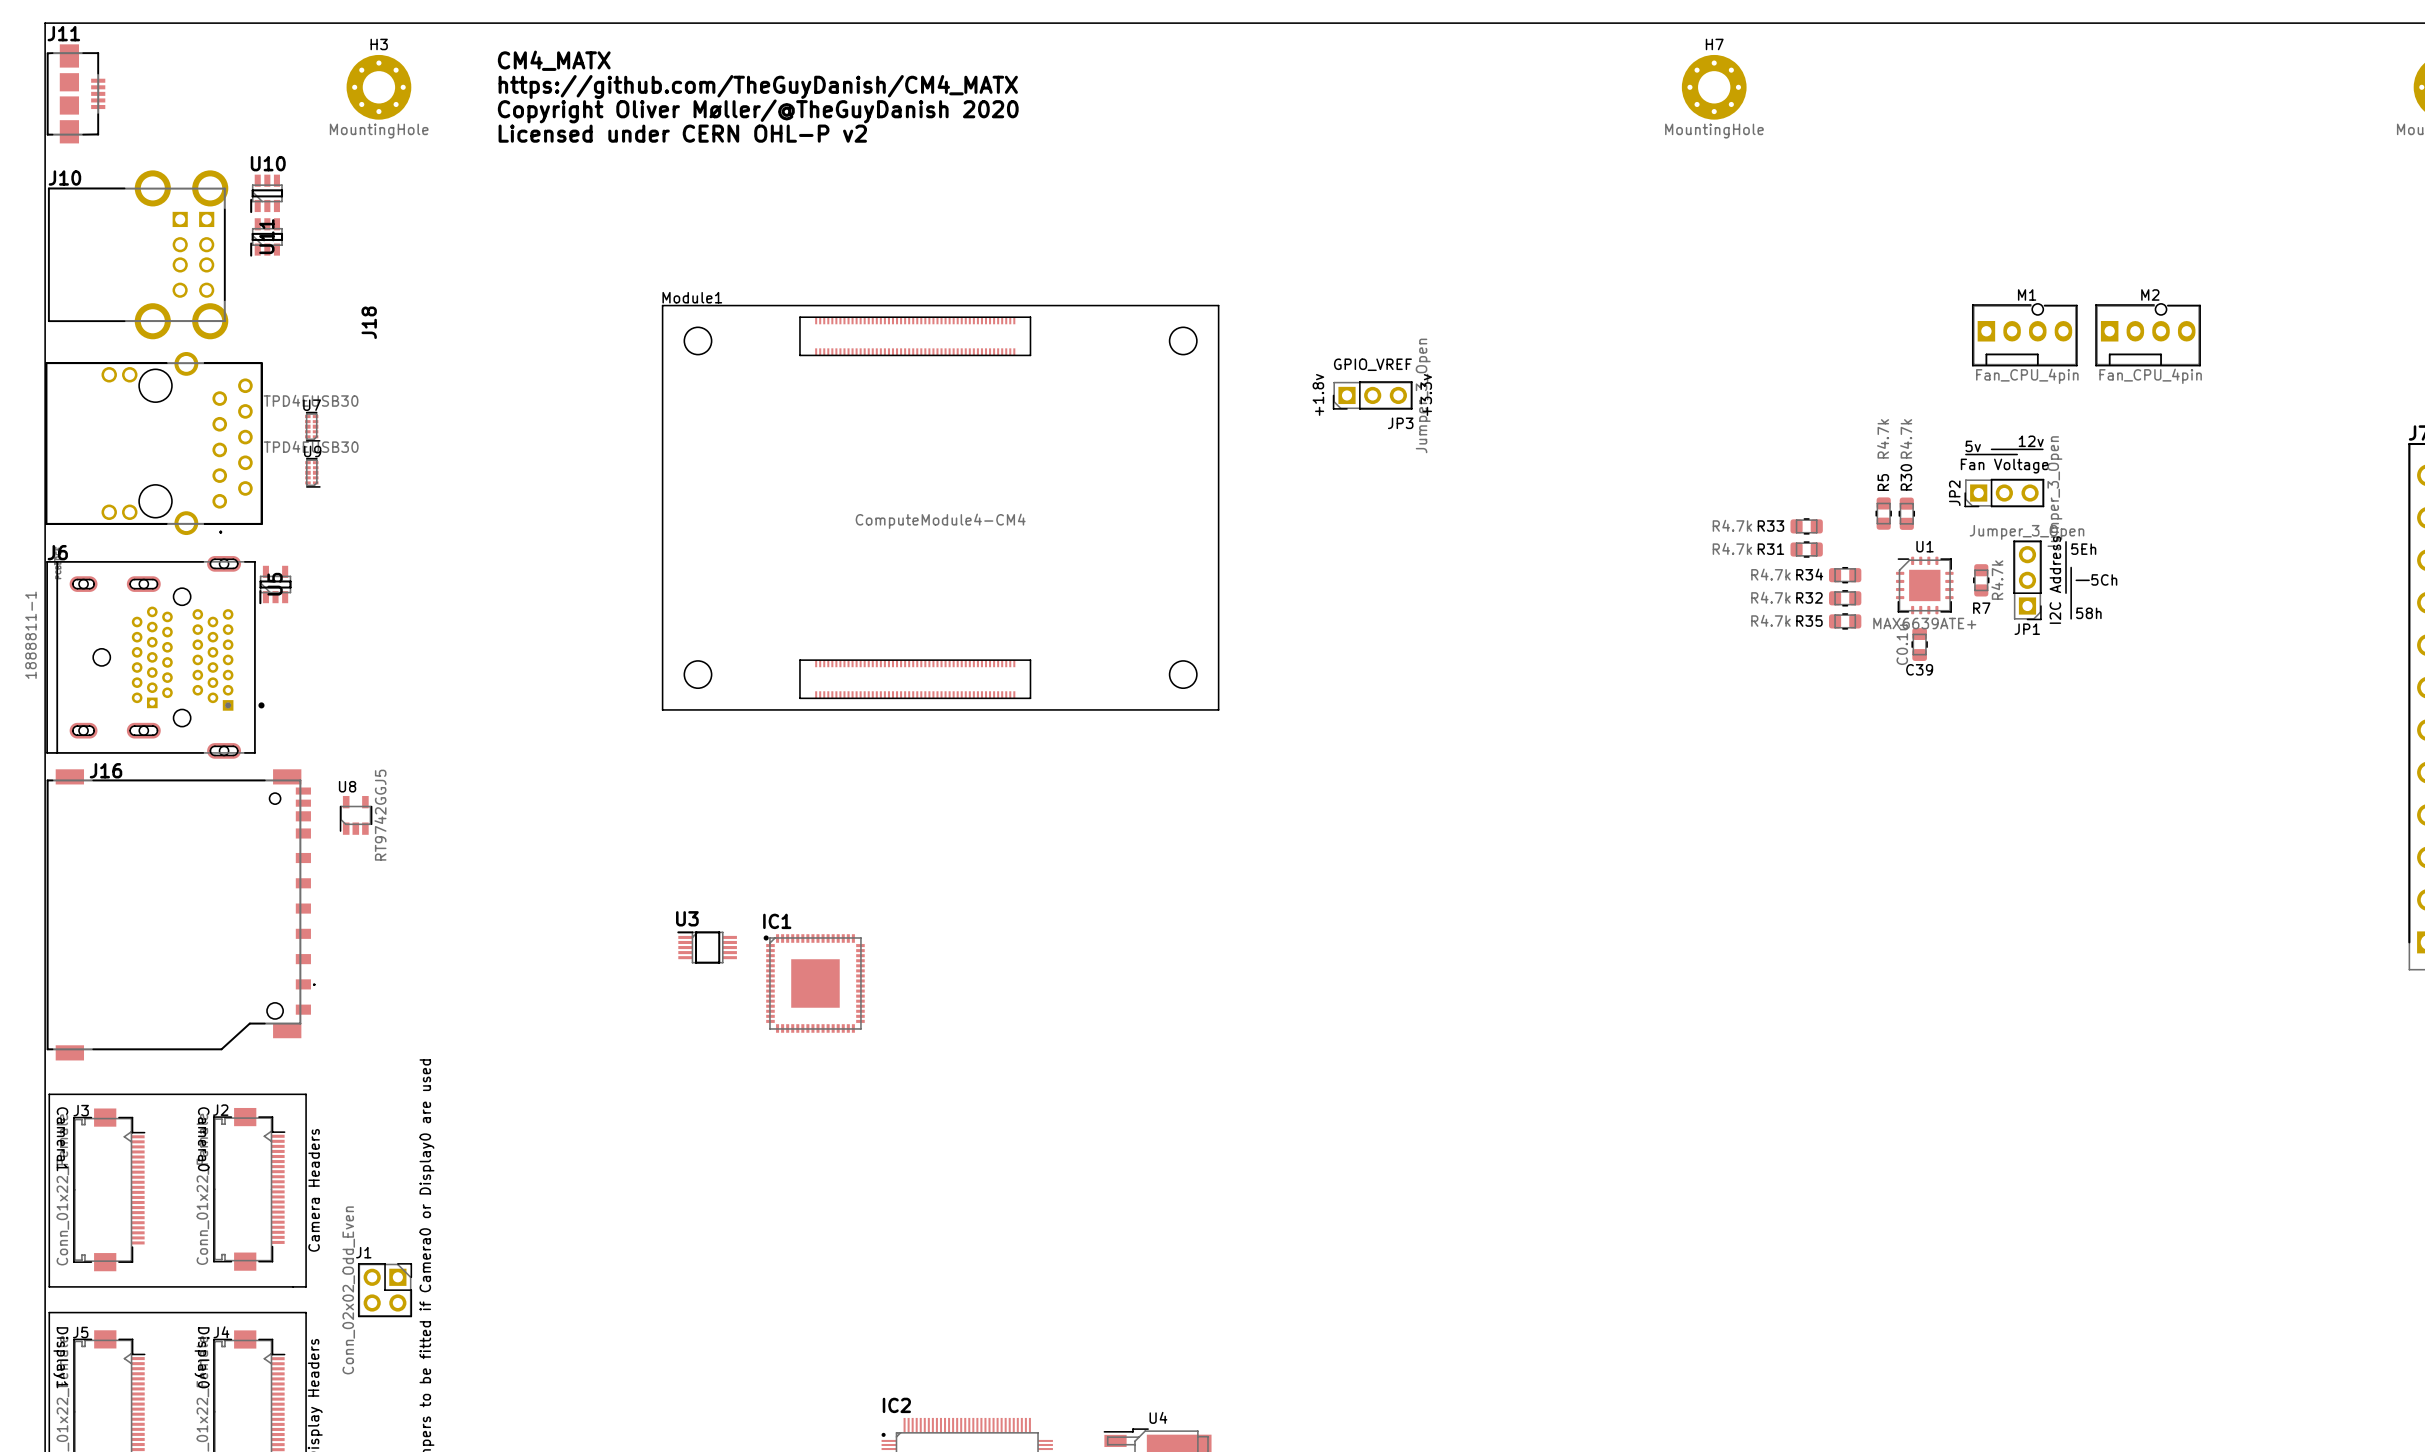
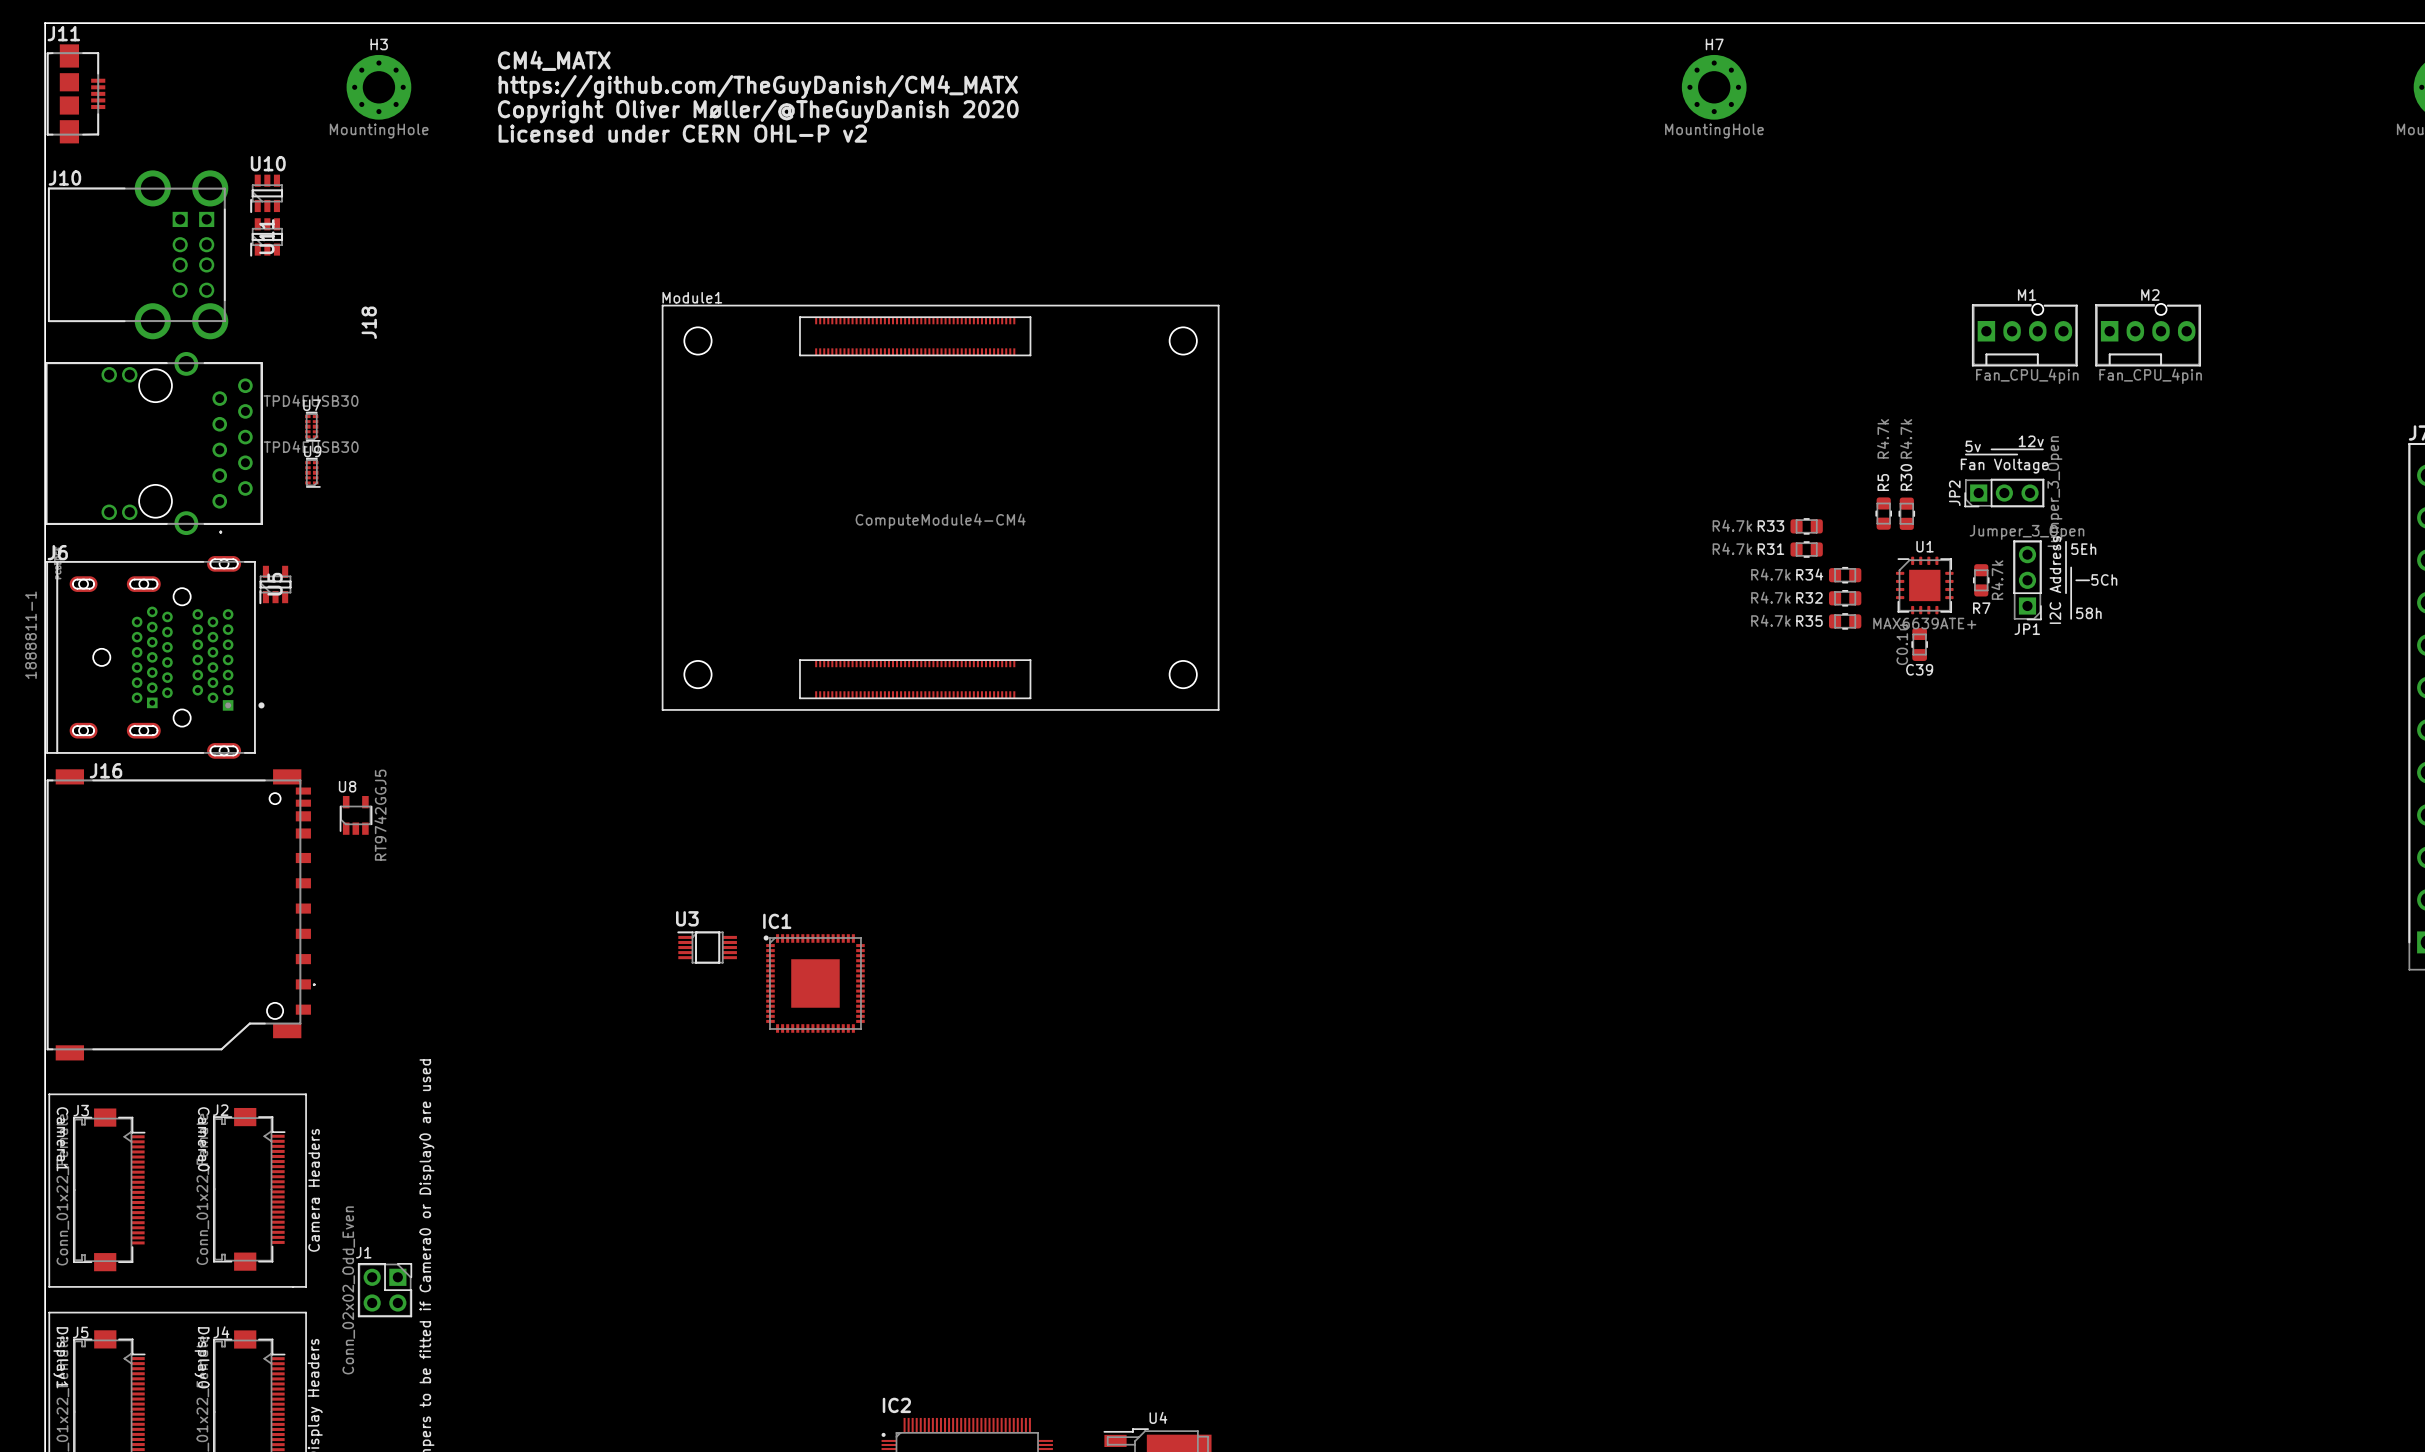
text: GPIO_VREF (1372, 364) -> none
text: +1.8v (1318, 394) -> none
JP3: Jumper_3_Open (1372, 395) -> none
text: +3.3v (1426, 395) -> none

